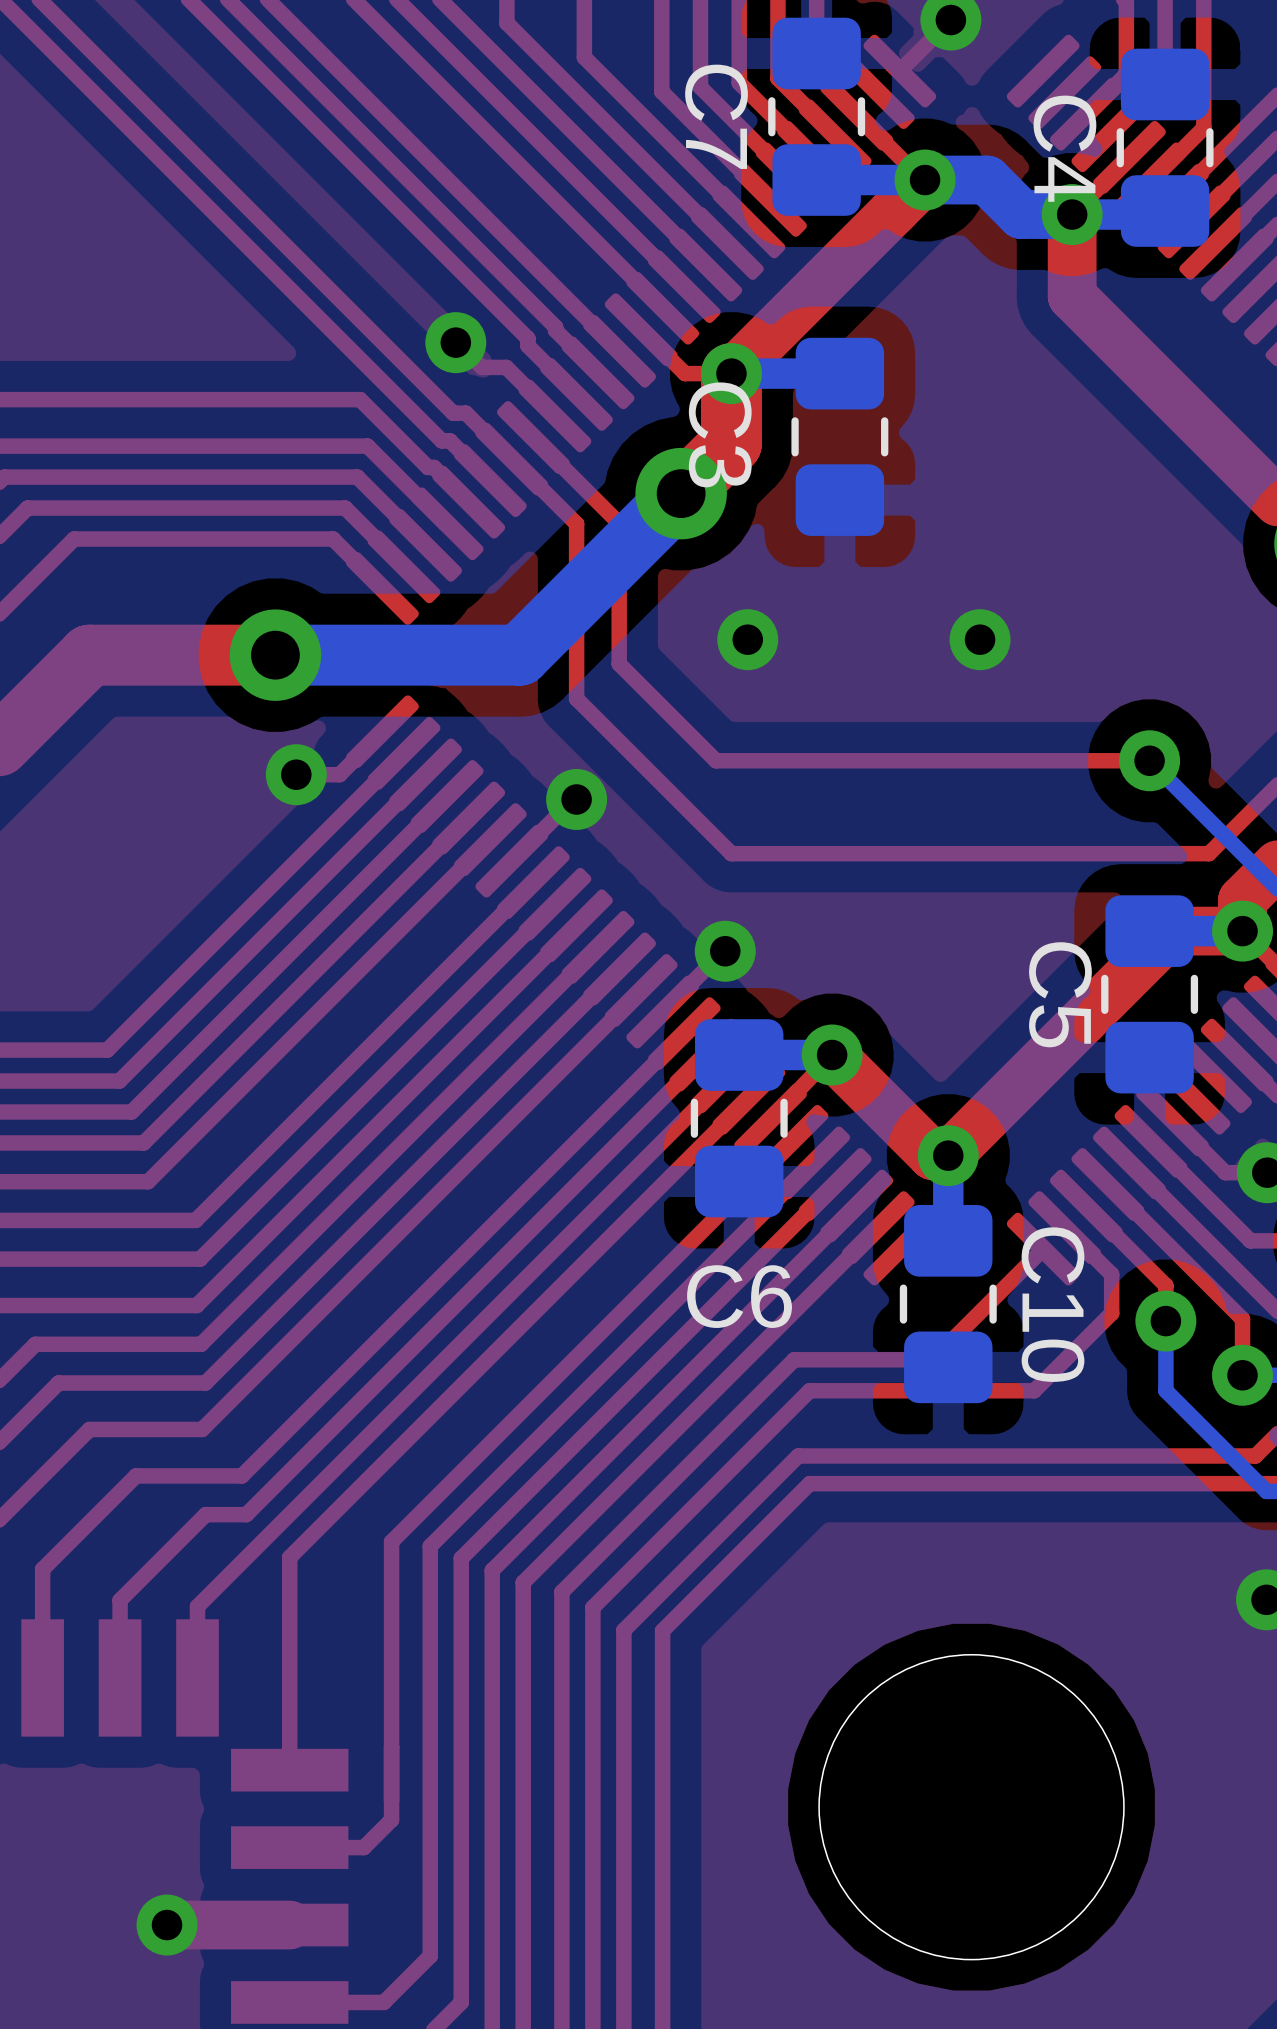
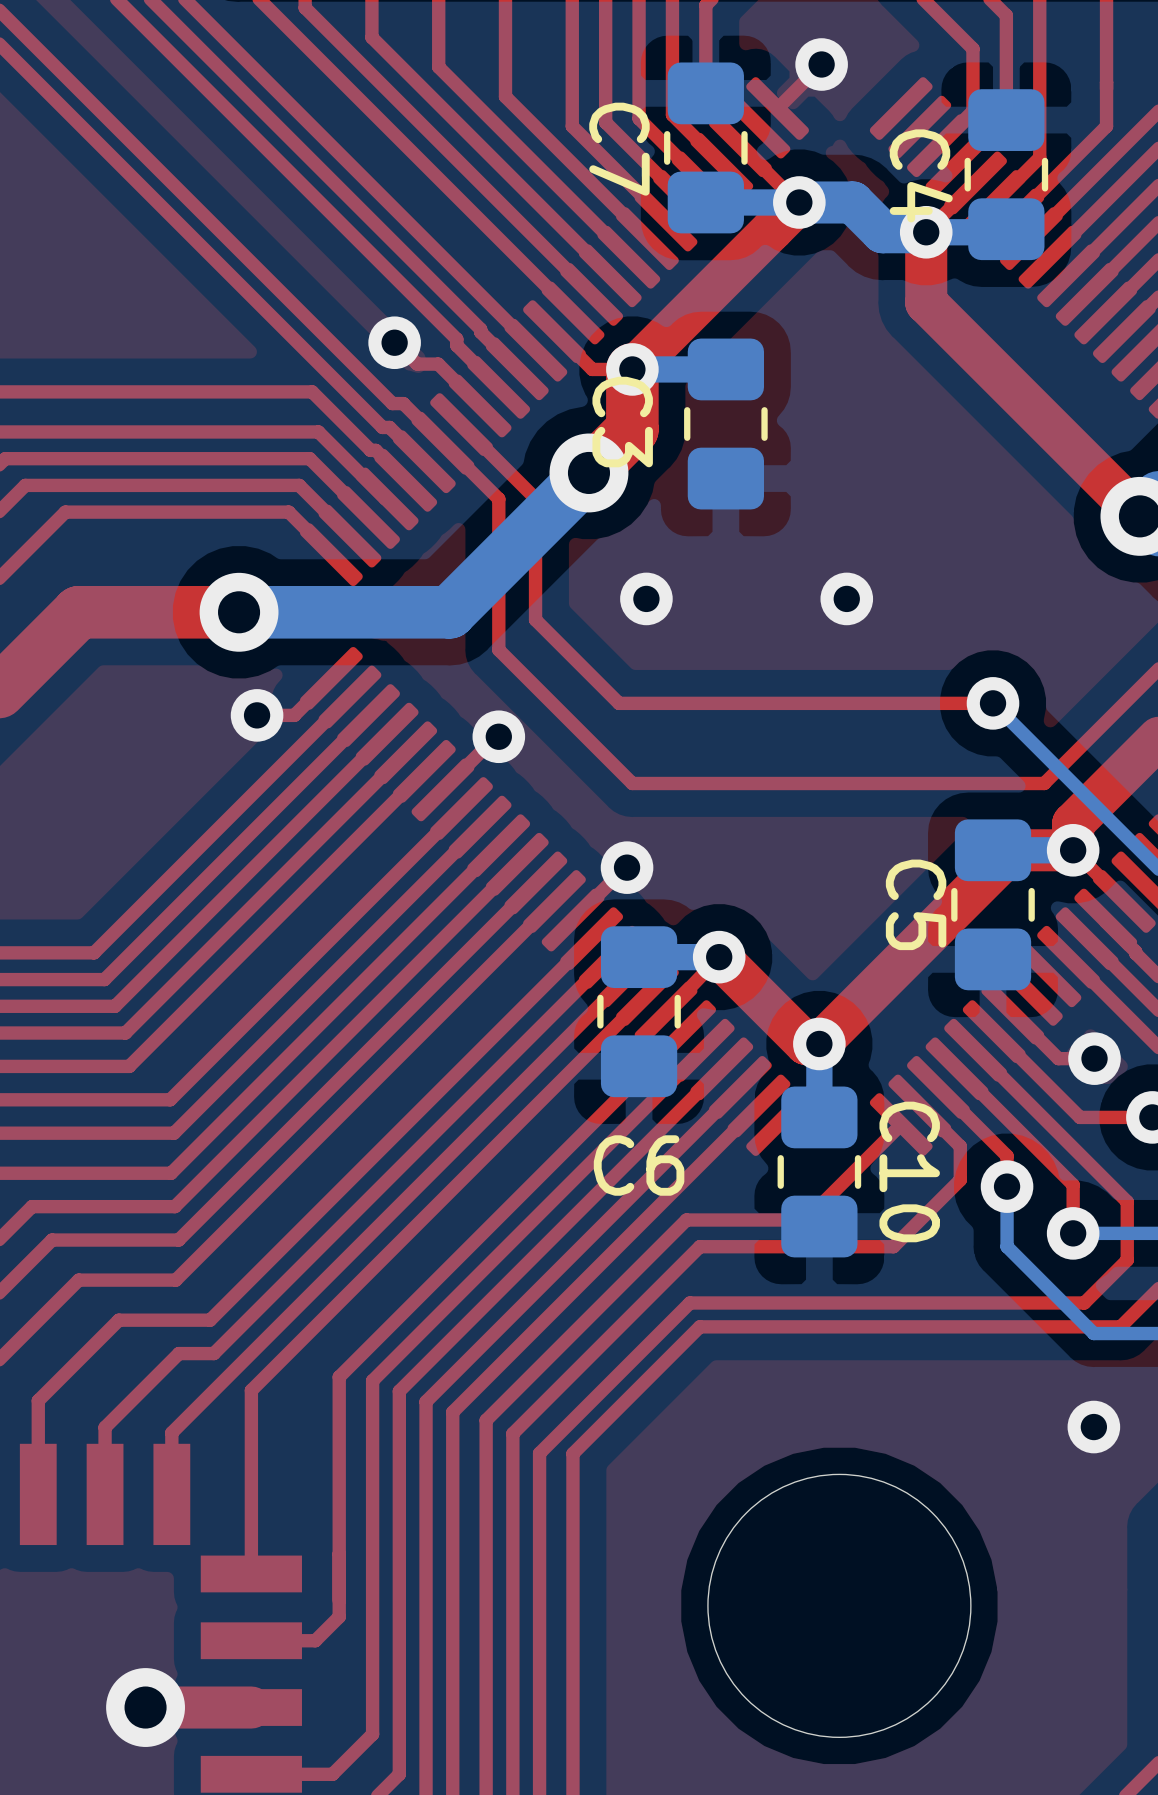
via size: [136, 1894, 198, 1956] -> [106, 1668, 185, 1747]

